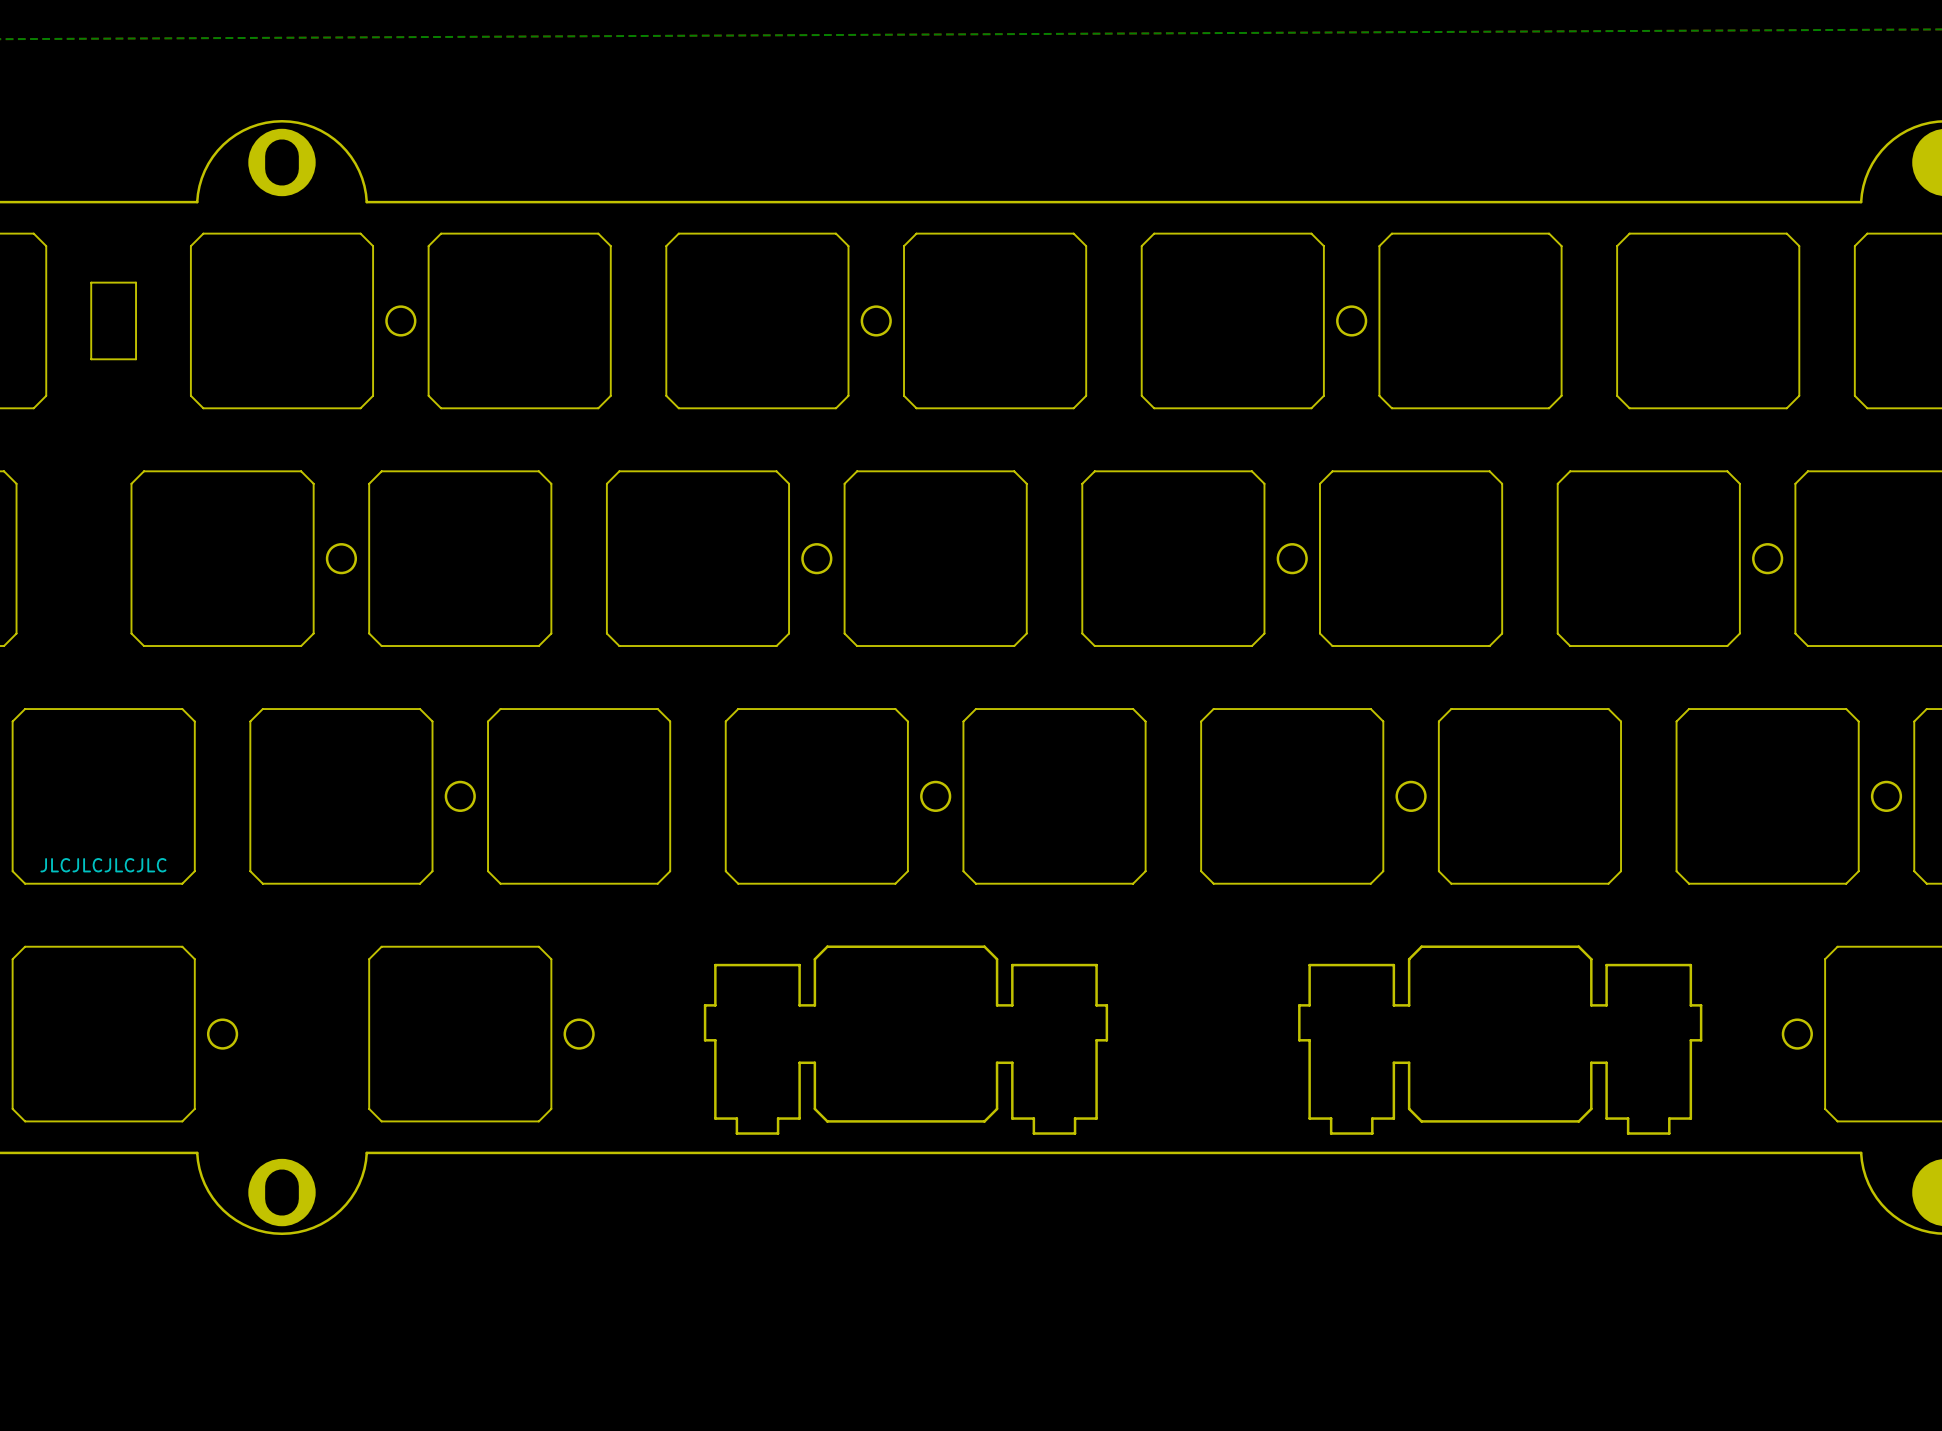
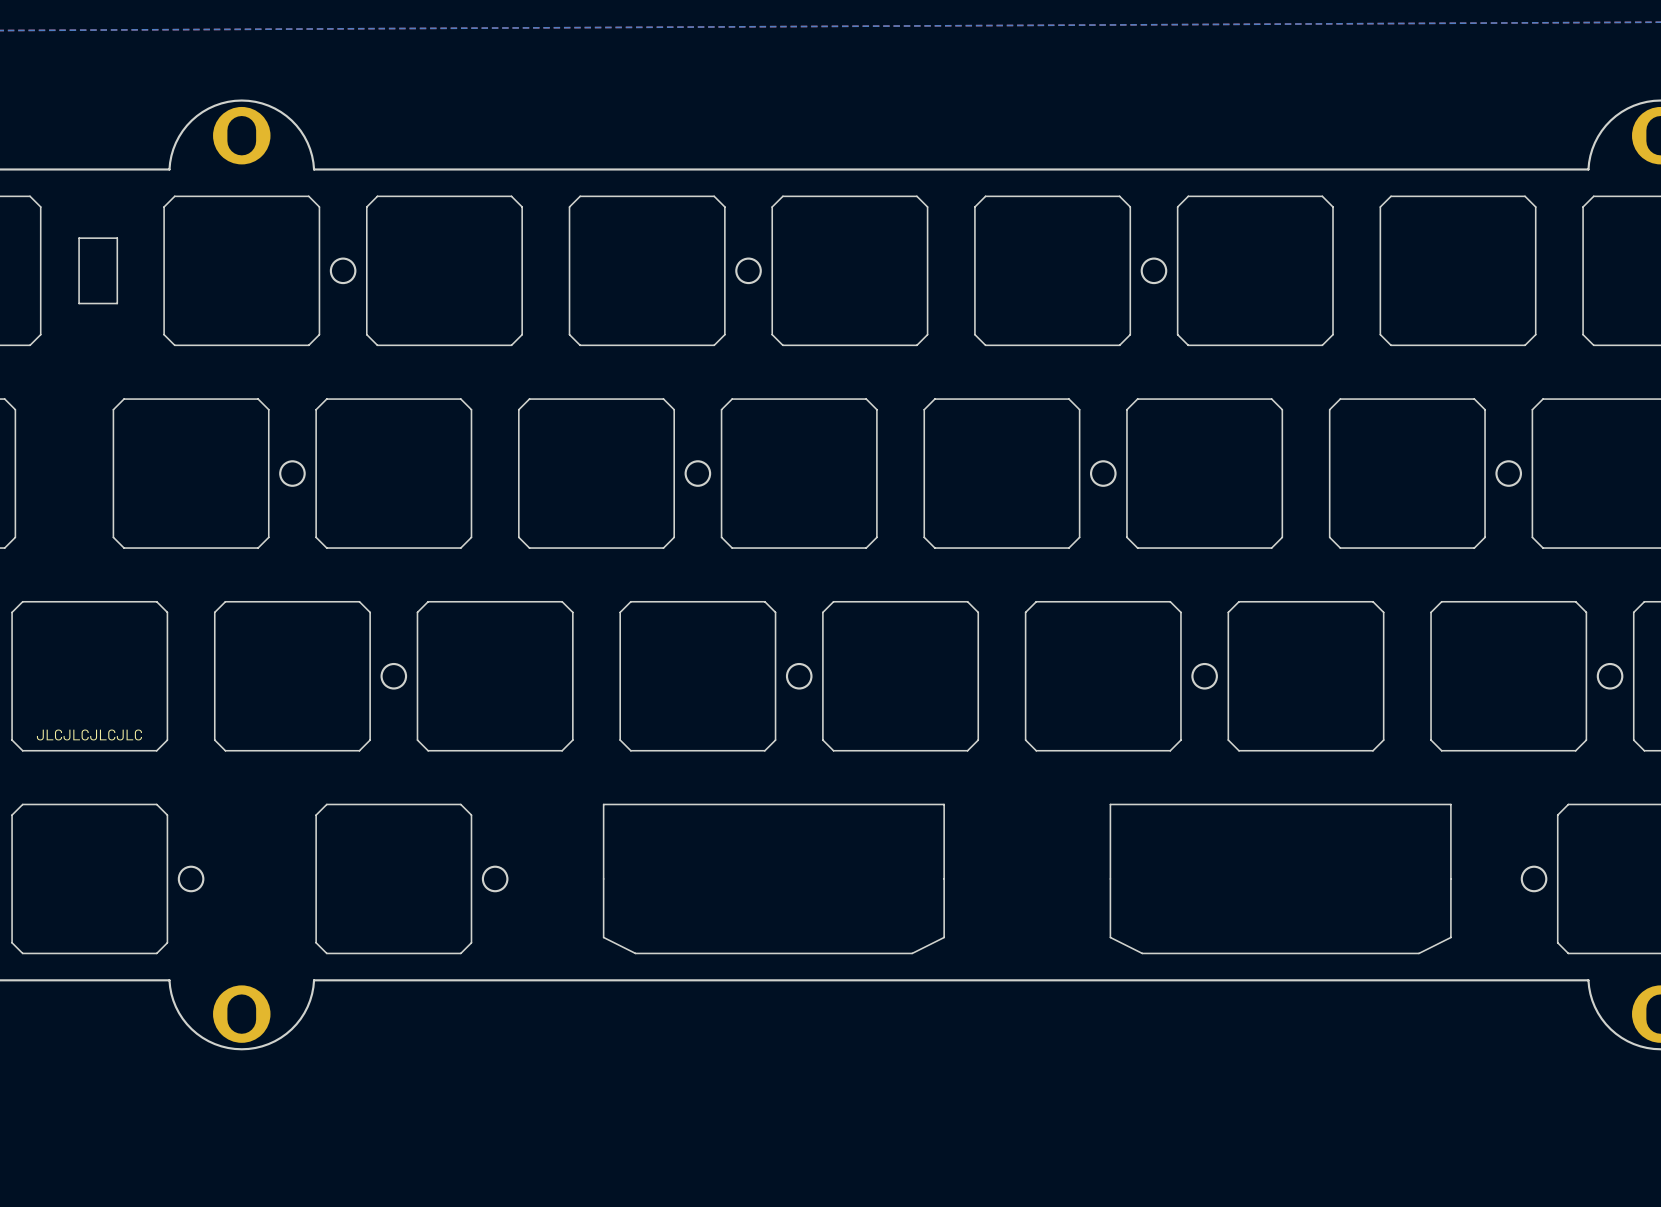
drawing: none -> [602, 803, 945, 955]
drawing: none -> [1109, 803, 1452, 955]
board edge: (984, 946) (997, 959) (997, 1005) (1012, 1005) (1012, 965) (1096, 965) (1096, 1005) (1106, 1005) (1106, 1040) (1096, 1040) (1096, 1118) (1075, 1118) (1075, 1133) (1033, 1133) (1033, 1118) (1012, 1118) (1012, 1062) (997, 1062) (997, 1108) (984, 1121) (827, 1121) (814, 1108) (814, 1062) (799, 1062) (799, 1118) (778, 1118) (778, 1133) (736, 1133) (736, 1118) (715, 1118) (715, 1040) (705, 1040) (705, 1005) (715, 1005) (715, 965) (799, 965) (799, 1005) (814, 1005) (814, 959) (827, 946) (984, 946) -> none
board edge: (1578, 946) (1421, 946) (1409, 959) (1409, 1005) (1393, 1005) (1393, 965) (1309, 965) (1309, 1005) (1299, 1005) (1299, 1040) (1309, 1040) (1309, 1118) (1331, 1118) (1331, 1133) (1372, 1133) (1372, 1118) (1393, 1118) (1393, 1062) (1409, 1062) (1409, 1108) (1421, 1121) (1578, 1121) (1591, 1108) (1591, 1062) (1606, 1062) (1606, 1118) (1628, 1118) (1628, 1133) (1669, 1133) (1669, 1118) (1690, 1118) (1690, 1040) (1701, 1040) (1701, 1005) (1690, 1005) (1690, 965) (1606, 965) (1606, 1005) (1591, 1005) (1591, 959) (1578, 946) -> none

